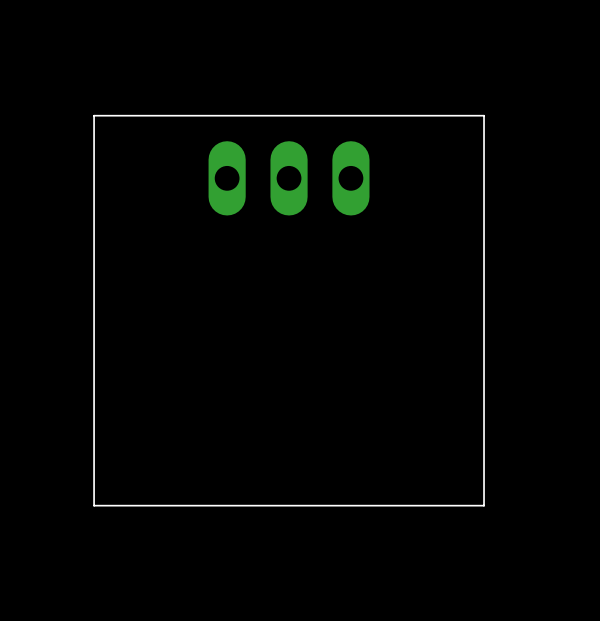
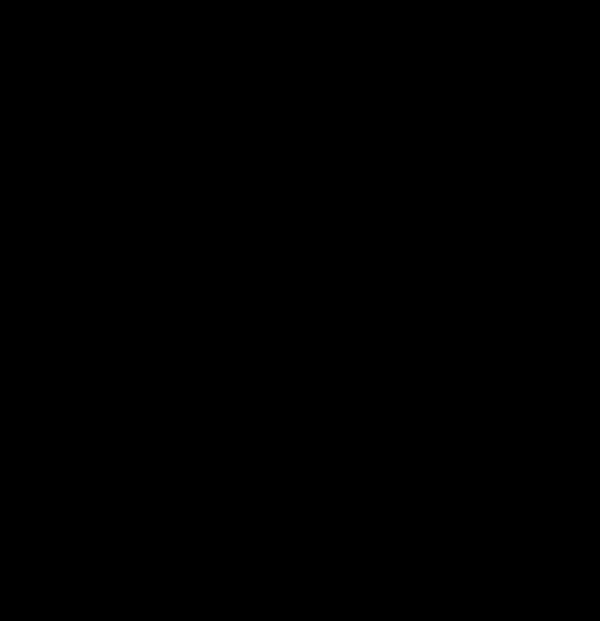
board edge: (484, 115) (94, 115) (94, 505) (484, 505) (484, 115) -> none
part: (289, 178) -> none

